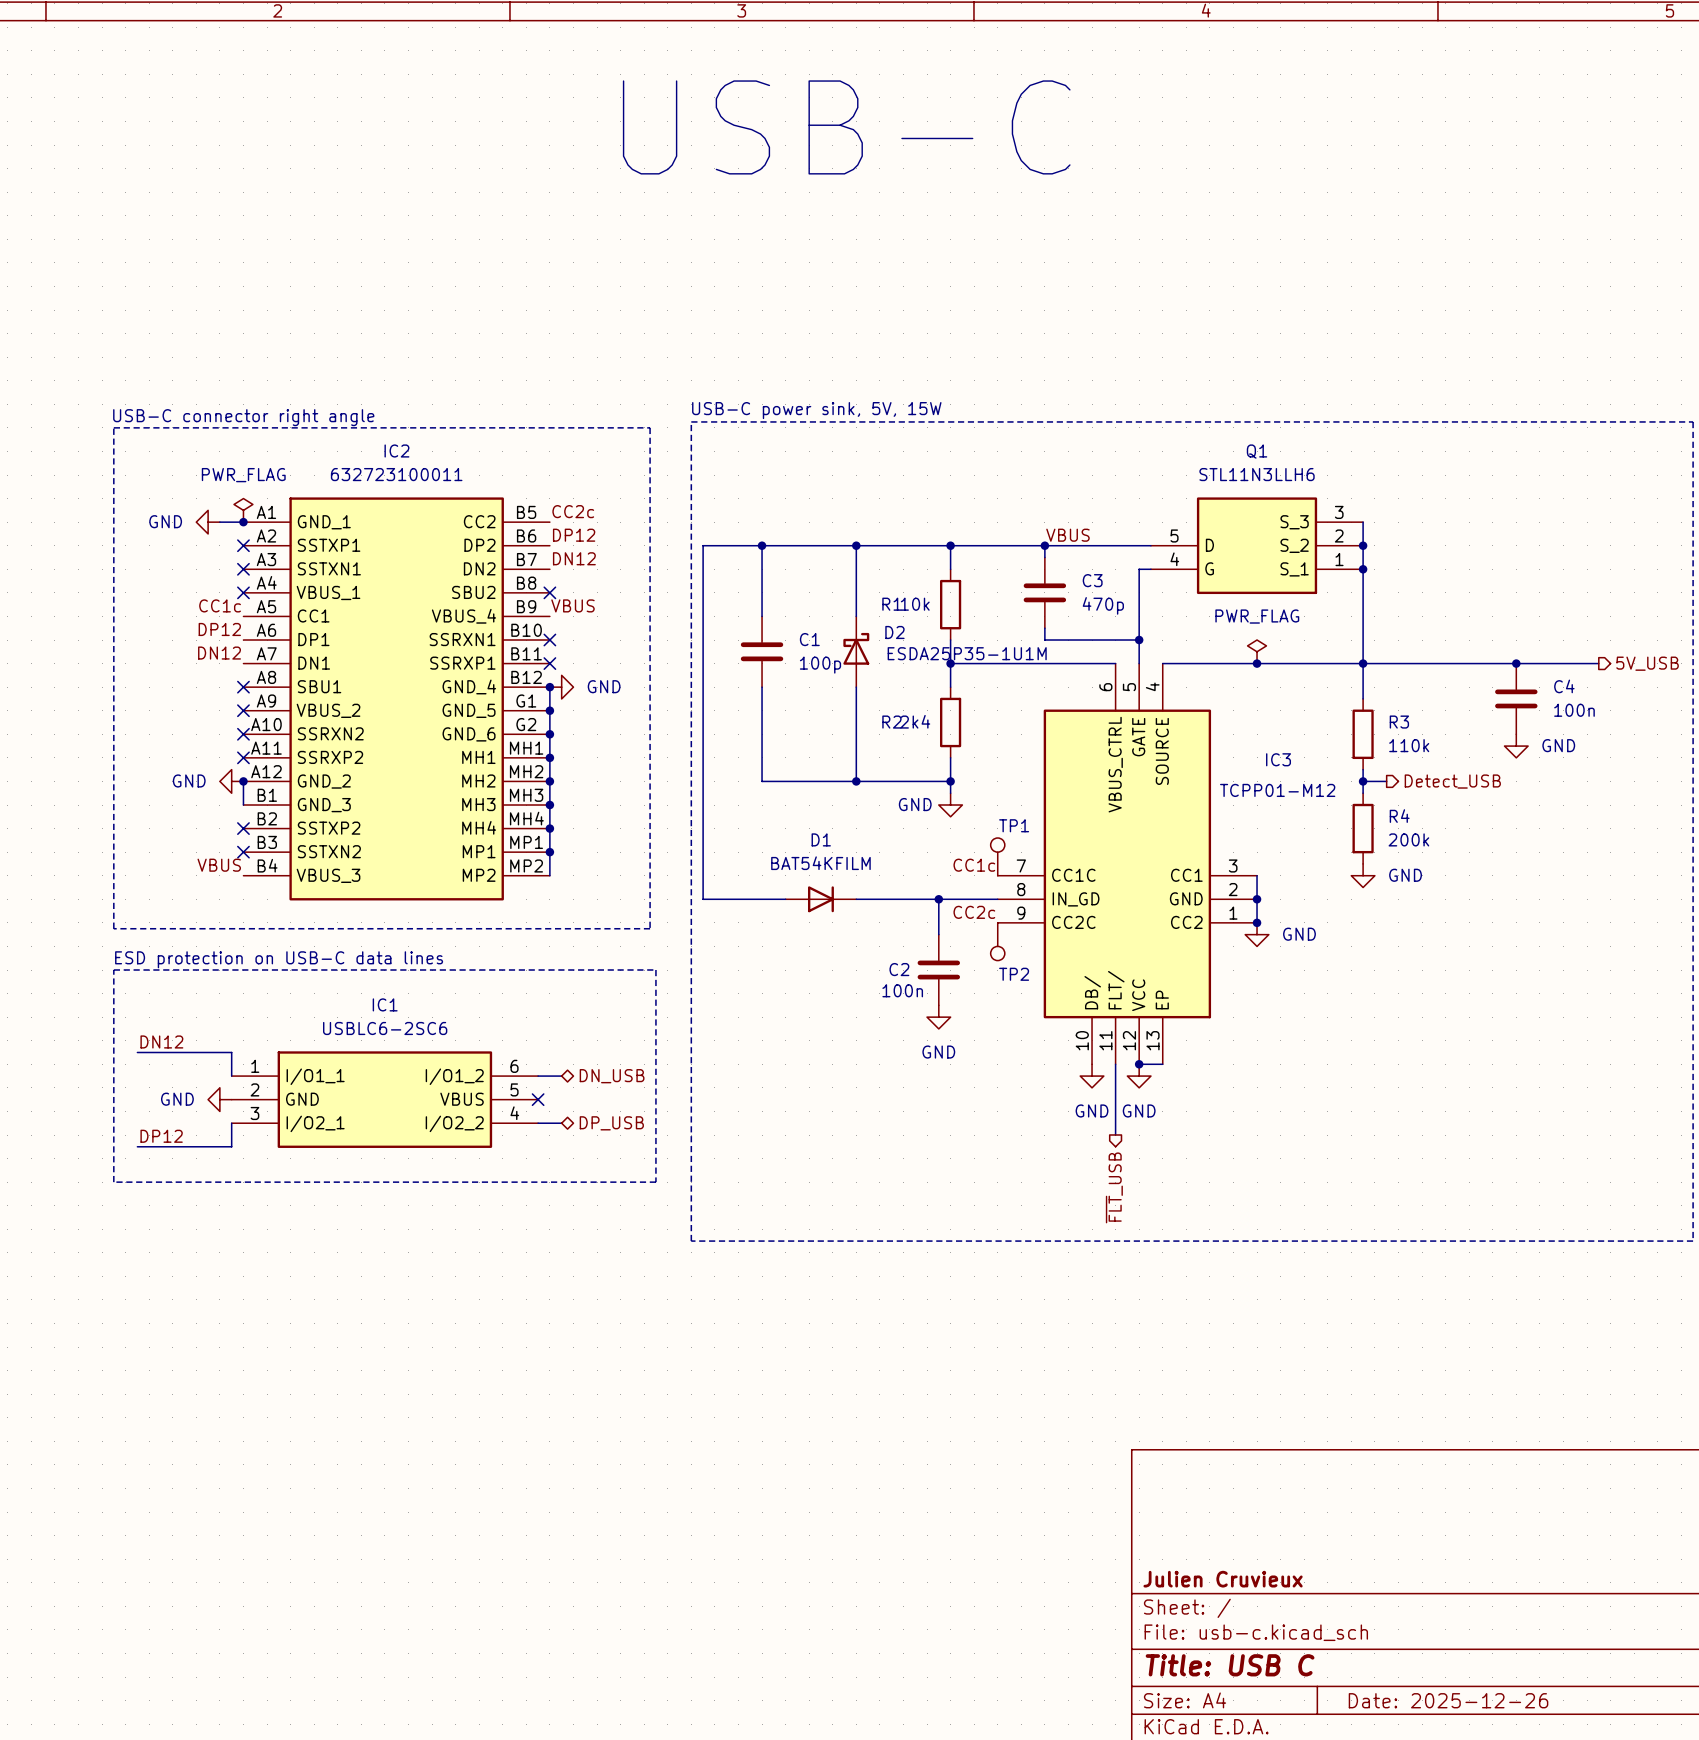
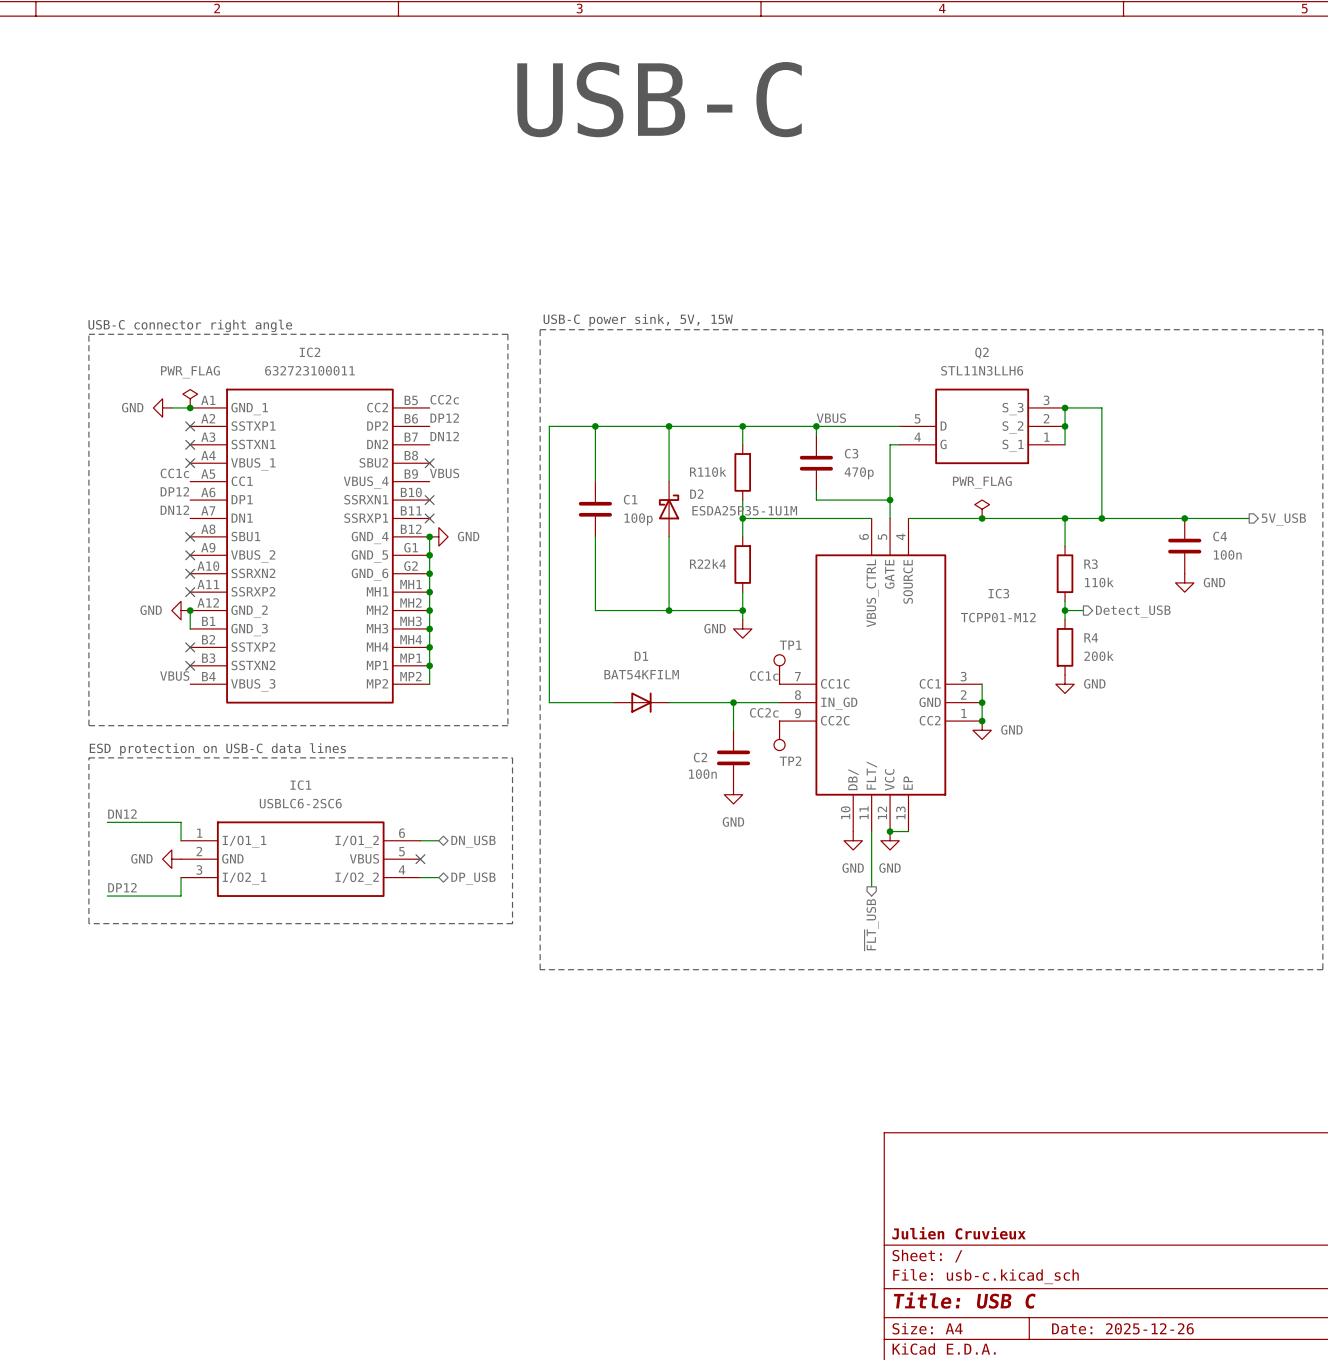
Q1 name: Q1 (1257, 451) -> Q2 (981, 353)
wire: none -> (1065, 407) (1101, 407) (1101, 518)
wire: (1363, 569) (1363, 663) -> none
junction position: (1363, 569) -> (1065, 407)
junction: none -> (1101, 518)

